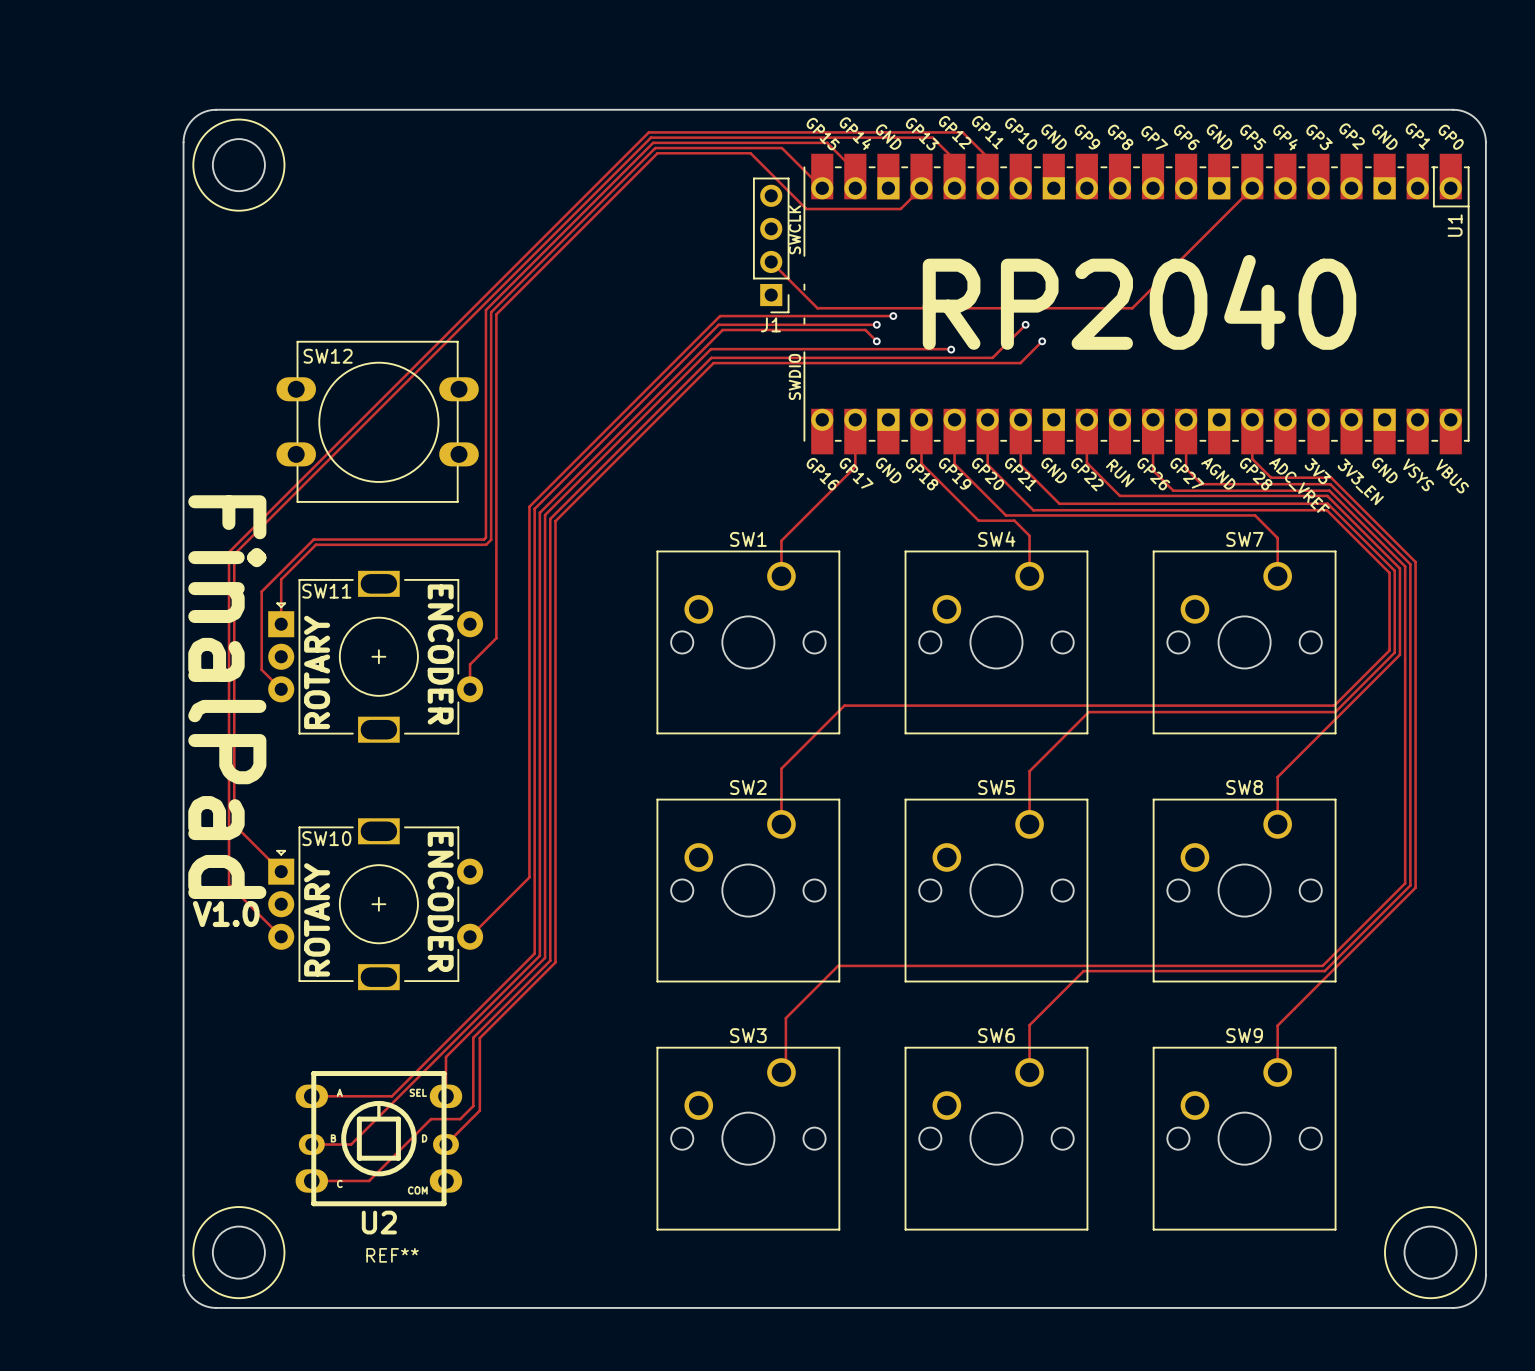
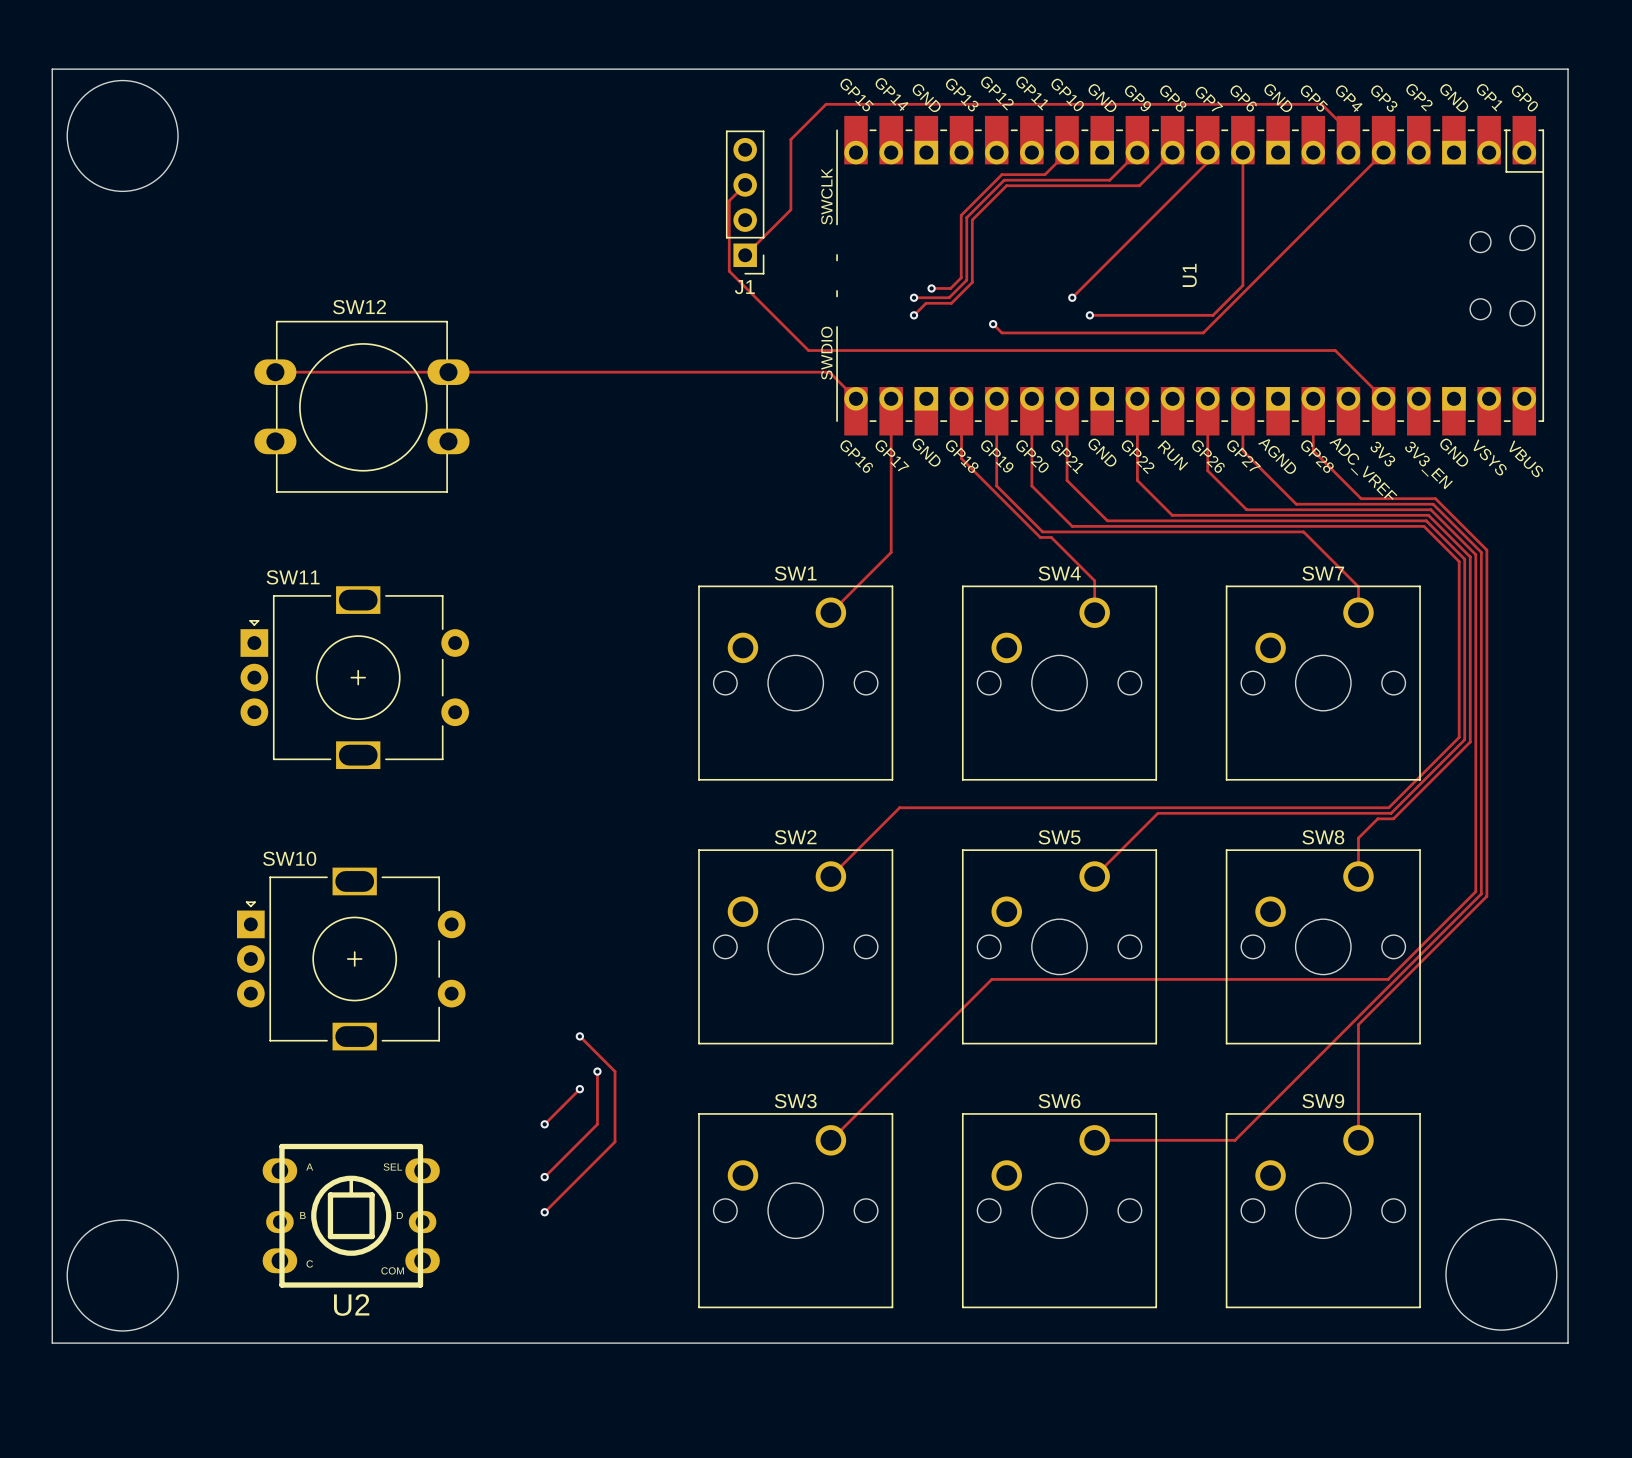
board edge: none -> (52, 69) (1568, 69) (1568, 1343) (52, 1343) (52, 69)
round board edge: none -> [66, 80, 179, 192]
track: none -> (1067, 152) (1044, 174) (1001, 174) (961, 215) (961, 277) (950, 288) (931, 288)
track: none -> (1137, 152) (1109, 180) (1004, 180) (966, 217) (966, 280) (949, 297) (914, 297)
track: none -> (1172, 152) (1139, 185) (1006, 185) (972, 219) (972, 282) (951, 303) (926, 303) (914, 315)
track: none -> (1207, 152) (1207, 162) (1072, 297)
track: none -> (1242, 152) (1242, 285) (1213, 315) (1089, 315)
track: none -> (1348, 152) (1348, 130) (1321, 104) (826, 104) (790, 139) (790, 209) (745, 255)
track: none -> (1383, 152) (1203, 332) (1001, 332) (993, 324)
U1 footprint: [803, 153, 1470, 455] -> [836, 115, 1545, 436]
track: none -> (745, 184) (729, 200) (729, 271) (808, 350) (1335, 350) (1383, 398)
track: (822, 188) (781, 148) (655, 148) (491, 312) (491, 539) (486, 544) (315, 544) (281, 579) (281, 624) -> none
track: (855, 188) (855, 171) (827, 142) (653, 142) (485, 310) (485, 537) (484, 539) (313, 539) (261, 591) (261, 669) (281, 689) -> none
track: (921, 188) (900, 209) (806, 209) (750, 153) (657, 153) (496, 314) (496, 638) (470, 664) (470, 689) -> none
track: (954, 188) (954, 159) (932, 137) (651, 137) (234, 554) (234, 824) (281, 871) -> none
track: (987, 188) (987, 157) (962, 132) (648, 132) (229, 552) (229, 884) (281, 936) -> none
track: (1252, 188) (1132, 308) (817, 308) (771, 261) -> none
U1 name position: U1 (1455, 225) -> U1 (1189, 275)
J1 position: (771, 245) -> (745, 202)
via: none -> (931, 288)
via: none -> (914, 297)
via: none -> (1072, 297)
via: none -> (914, 315)
via: none -> (1089, 315)
via: none -> (993, 324)
track: (893, 316) (720, 316) (529, 506) (529, 877) (470, 936) -> none
via: (893, 316) -> none
track: (876, 324) (718, 324) (534, 508) (534, 953) (391, 1096) (311, 1096) -> none
via: (876, 324) -> none
track: (1025, 324) (992, 357) (711, 357) (550, 518) (550, 960) (473, 1037) (473, 1106) (460, 1119) (430, 1119) (369, 1180) (311, 1180) -> none
via: (1025, 324) -> none
track: (876, 341) (865, 330) (722, 330) (539, 512) (539, 955) (351, 1144) (311, 1144) -> none
via: (876, 341) -> none
track: (1042, 341) (1020, 363) (713, 363) (555, 521) (555, 962) (479, 1038) (479, 1110) (445, 1144) -> none
via: (1042, 341) -> none
track: (951, 349) (710, 349) (545, 515) (545, 957) (445, 1056) (445, 1096) -> none
via: (951, 349) -> none
track: none -> (275, 372) (829, 372) (856, 398)
SW12 name position: SW12 (328, 356) -> SW12 (359, 307)
track: (855, 419) (855, 466) (781, 540) (781, 576) -> (891, 398) (891, 552) (830, 612)
track: (921, 419) (921, 463) (978, 520) (1014, 520) (1029, 535) (1029, 546) -> (961, 398) (961, 458) (1040, 537) (1051, 537) (1094, 580)
track: (954, 419) (954, 464) (1005, 515) (1255, 515) (1277, 538) (1277, 551) -> (996, 398) (996, 485) (1042, 531) (1303, 531) (1358, 586)
track: (987, 419) (987, 464) (1033, 510) (1326, 510) (1389, 572) (1389, 650) (1334, 705) (844, 705) (781, 768) (781, 824) -> (1031, 398) (1031, 485) (1072, 526) (1424, 526) (1459, 561) (1459, 737) (1388, 807) (899, 807) (830, 876)
track: (1020, 419) (1020, 465) (1059, 503) (1327, 503) (1394, 570) (1394, 652) (1335, 712) (1088, 712) (1029, 771) (1029, 824) -> (1067, 398) (1067, 480) (1107, 520) (1426, 520) (1464, 559) (1464, 739) (1391, 813) (1157, 813) (1094, 876)
track: (1086, 419) (1086, 462) (1119, 495) (1327, 495) (1399, 568) (1399, 654) (1277, 777) (1277, 788) -> (1137, 398) (1137, 480) (1172, 515) (1428, 515) (1470, 556) (1470, 742) (1393, 818) (1377, 818) (1358, 838)
track: (1153, 419) (1153, 470) (1173, 490) (1329, 490) (1405, 566) (1405, 883) (1322, 965) (838, 965) (785, 1018) (785, 1068) -> (1207, 398) (1207, 470) (1246, 509) (1430, 509) (1475, 554) (1475, 891) (1388, 979) (991, 979) (835, 1135)
track: (1186, 419) (1186, 468) (1201, 484) (1330, 484) (1410, 564) (1410, 885) (1324, 971) (1083, 971) (1029, 1025) (1029, 1072) -> (1242, 398) (1242, 450) (1296, 504) (1433, 504) (1481, 552) (1481, 893) (1234, 1140) (1094, 1140)
track: (1252, 419) (1252, 458) (1271, 477) (1331, 477) (1415, 562) (1415, 887) (1277, 1025) -> (1313, 398) (1313, 450) (1361, 498) (1435, 498) (1486, 550) (1486, 896) (1358, 1024) (1358, 1090)
SW12 position: (377, 421) -> (361, 406)
SW11 name position: SW11 (326, 591) -> SW11 (293, 577)
SW11 text: ENCODER (440, 654) -> none
SW11 position: (375, 656) -> (354, 677)
SW11 text: ROTARY (317, 672) -> none
REF**: (834, 708) -> none
SW10 name position: SW10 (326, 838) -> SW10 (289, 858)
SW10 text: ENCODER (440, 901) -> none
SW10 position: (375, 904) -> (351, 959)
SW10 text: ROTARY (317, 919) -> none
track: none -> (579, 1036) (615, 1071) (615, 1141) (544, 1212)
via: none -> (579, 1036)
track: none -> (597, 1071) (597, 1124) (544, 1177)
via: none -> (597, 1071)
track: none -> (579, 1089) (544, 1124)
via: none -> (579, 1089)
via: none -> (544, 1124)
via: none -> (544, 1177)
U2 position: (378, 1138) -> (351, 1215)
via: none -> (544, 1212)
round board edge: none -> [1445, 1218, 1558, 1331]
round board edge: none -> [66, 1219, 179, 1332]

